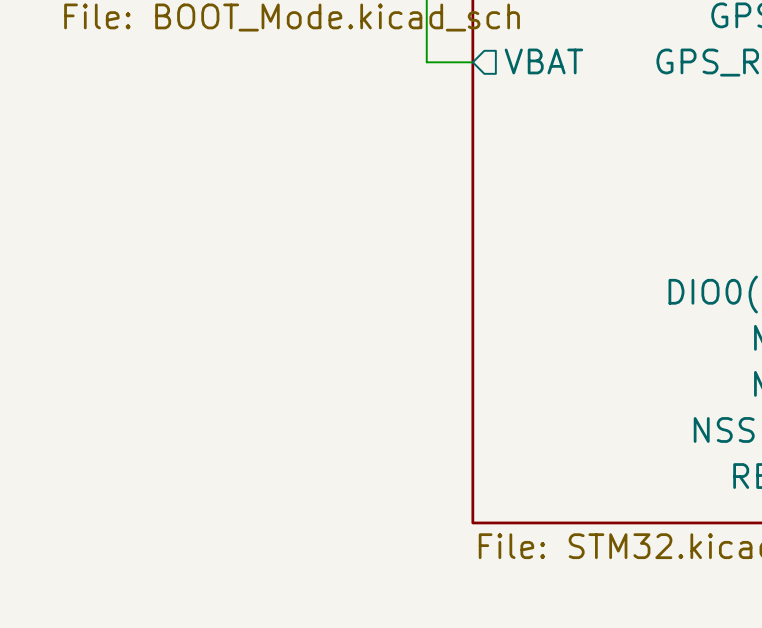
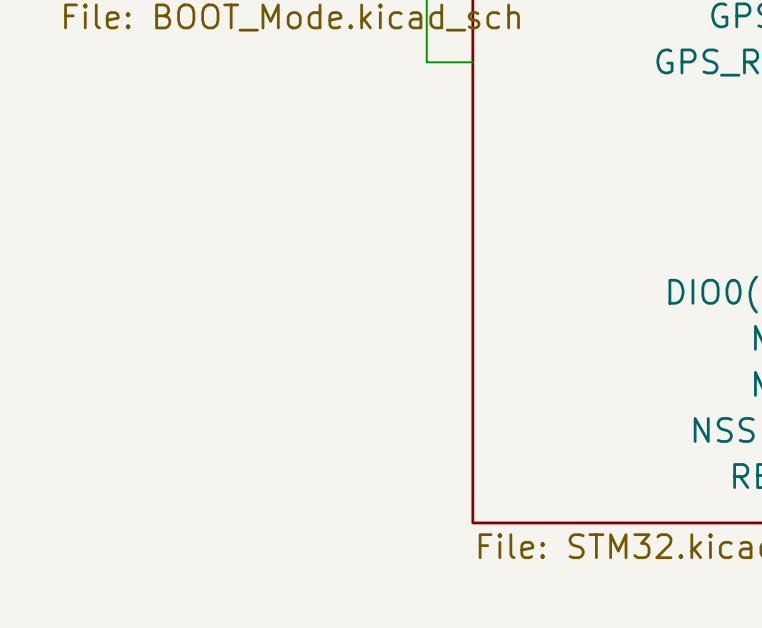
sheet pin: VBAT (543, 61) -> none

